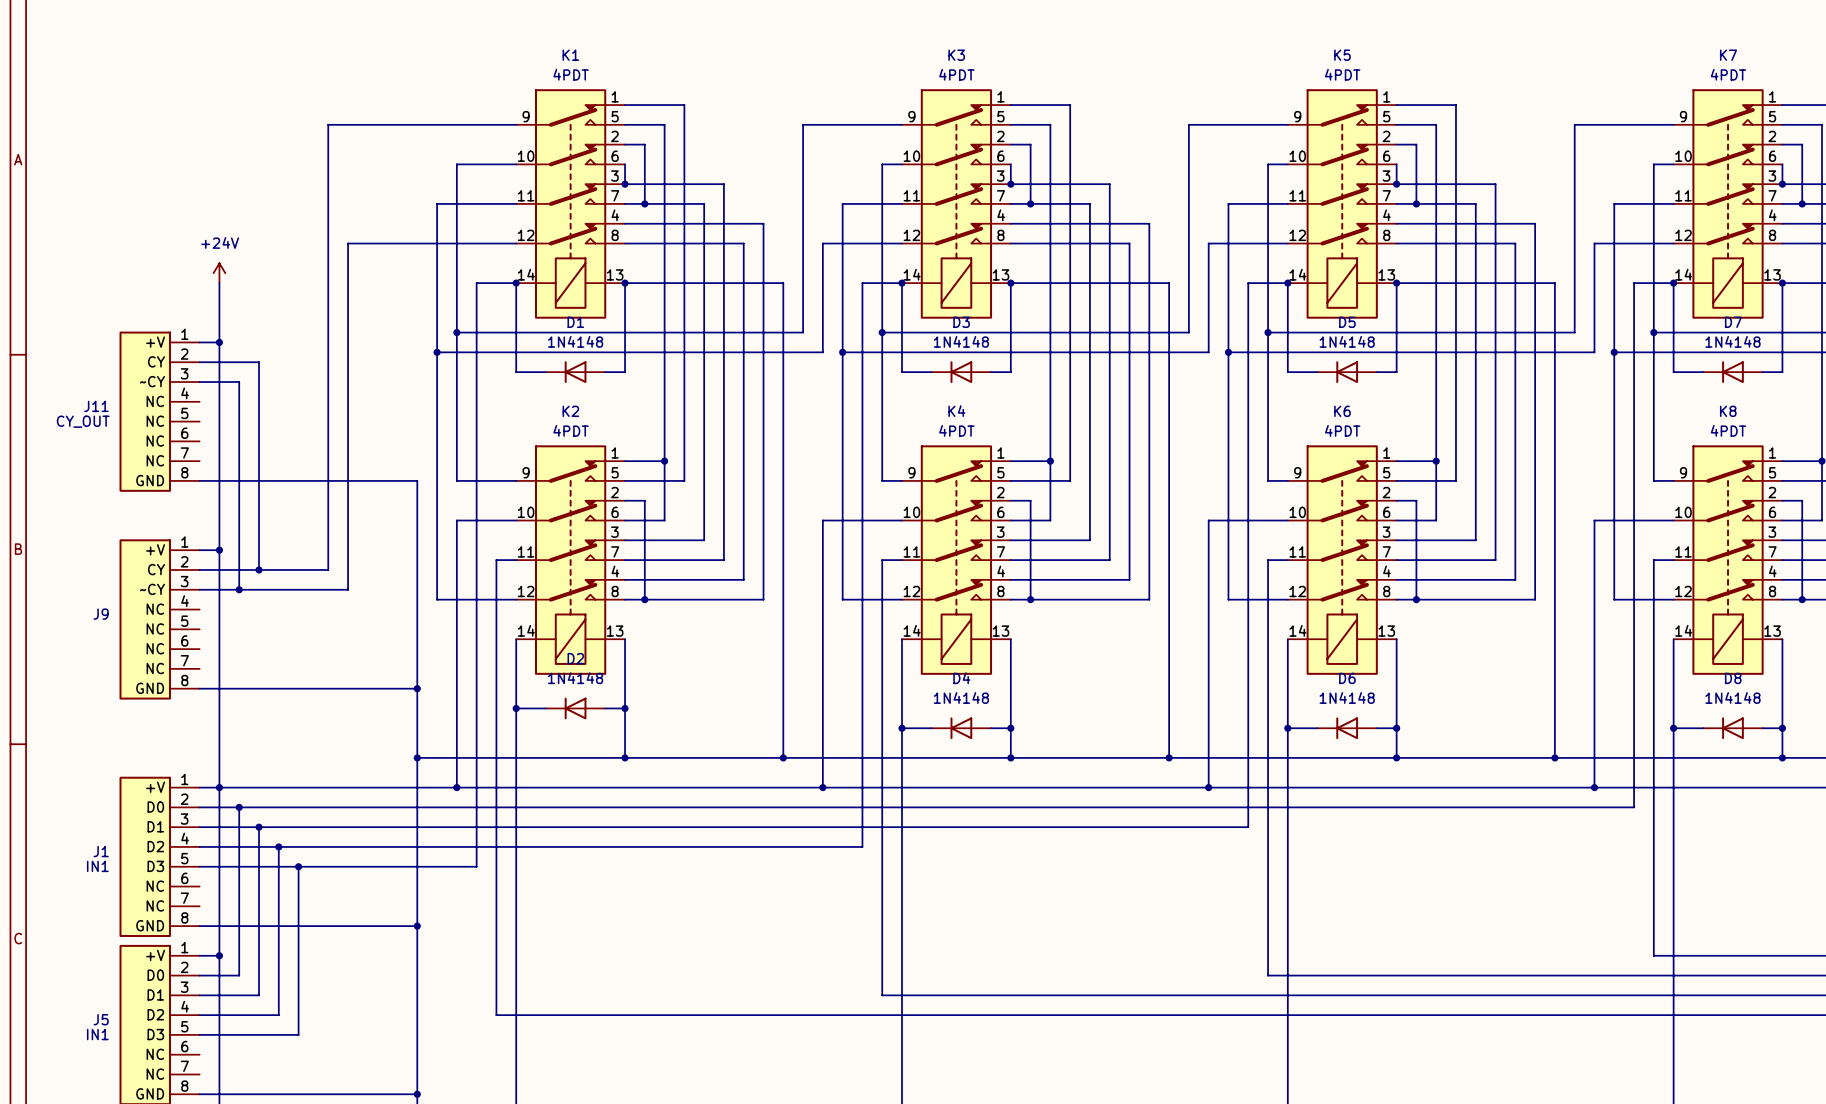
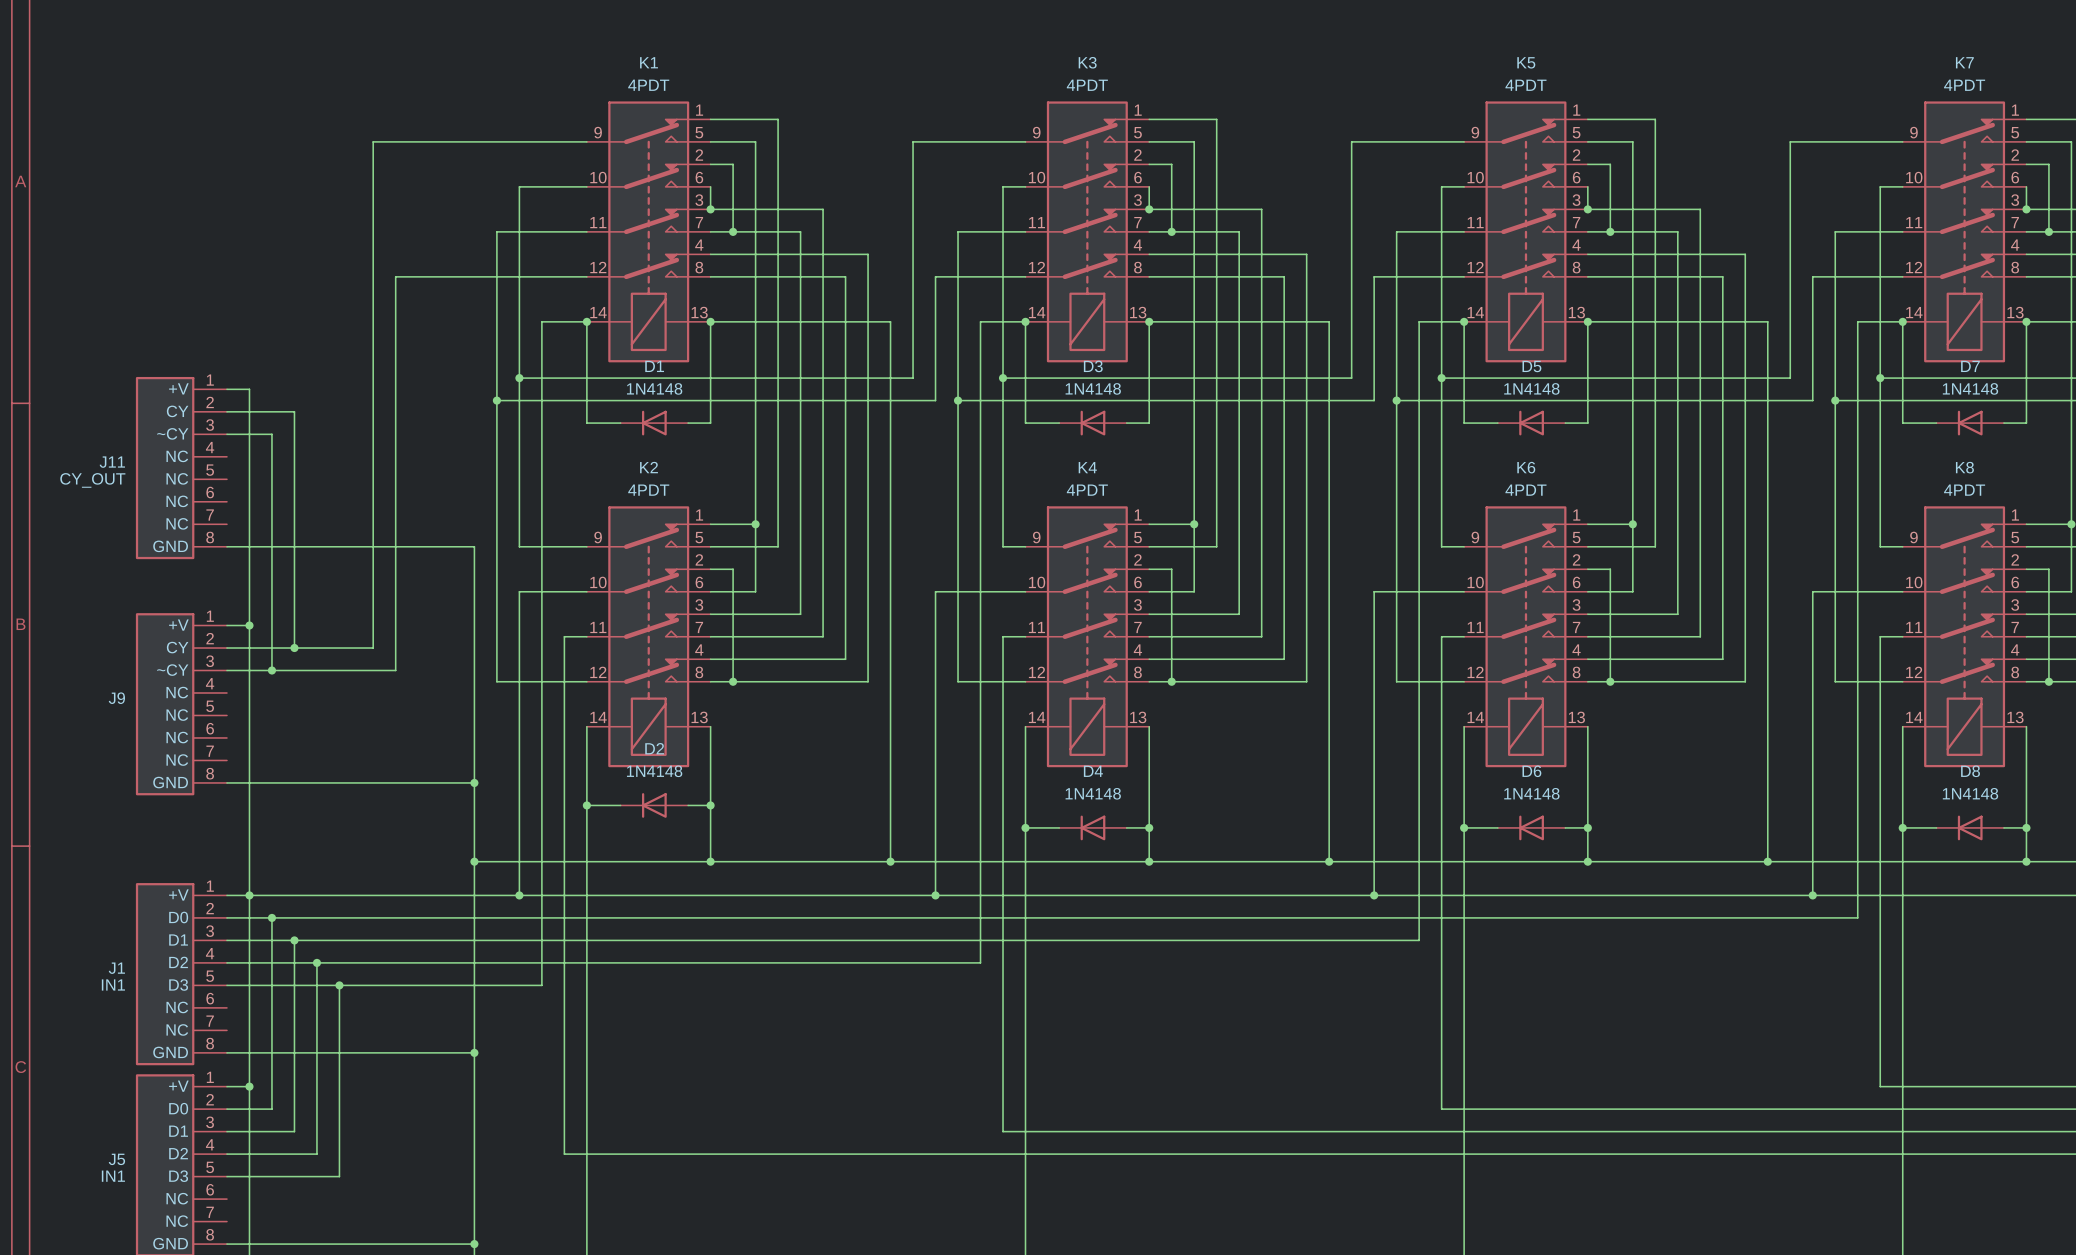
power symbol: +24V (219, 273) -> none
wire: (219, 283) (219, 342) -> none
junction: (219, 342) -> none

